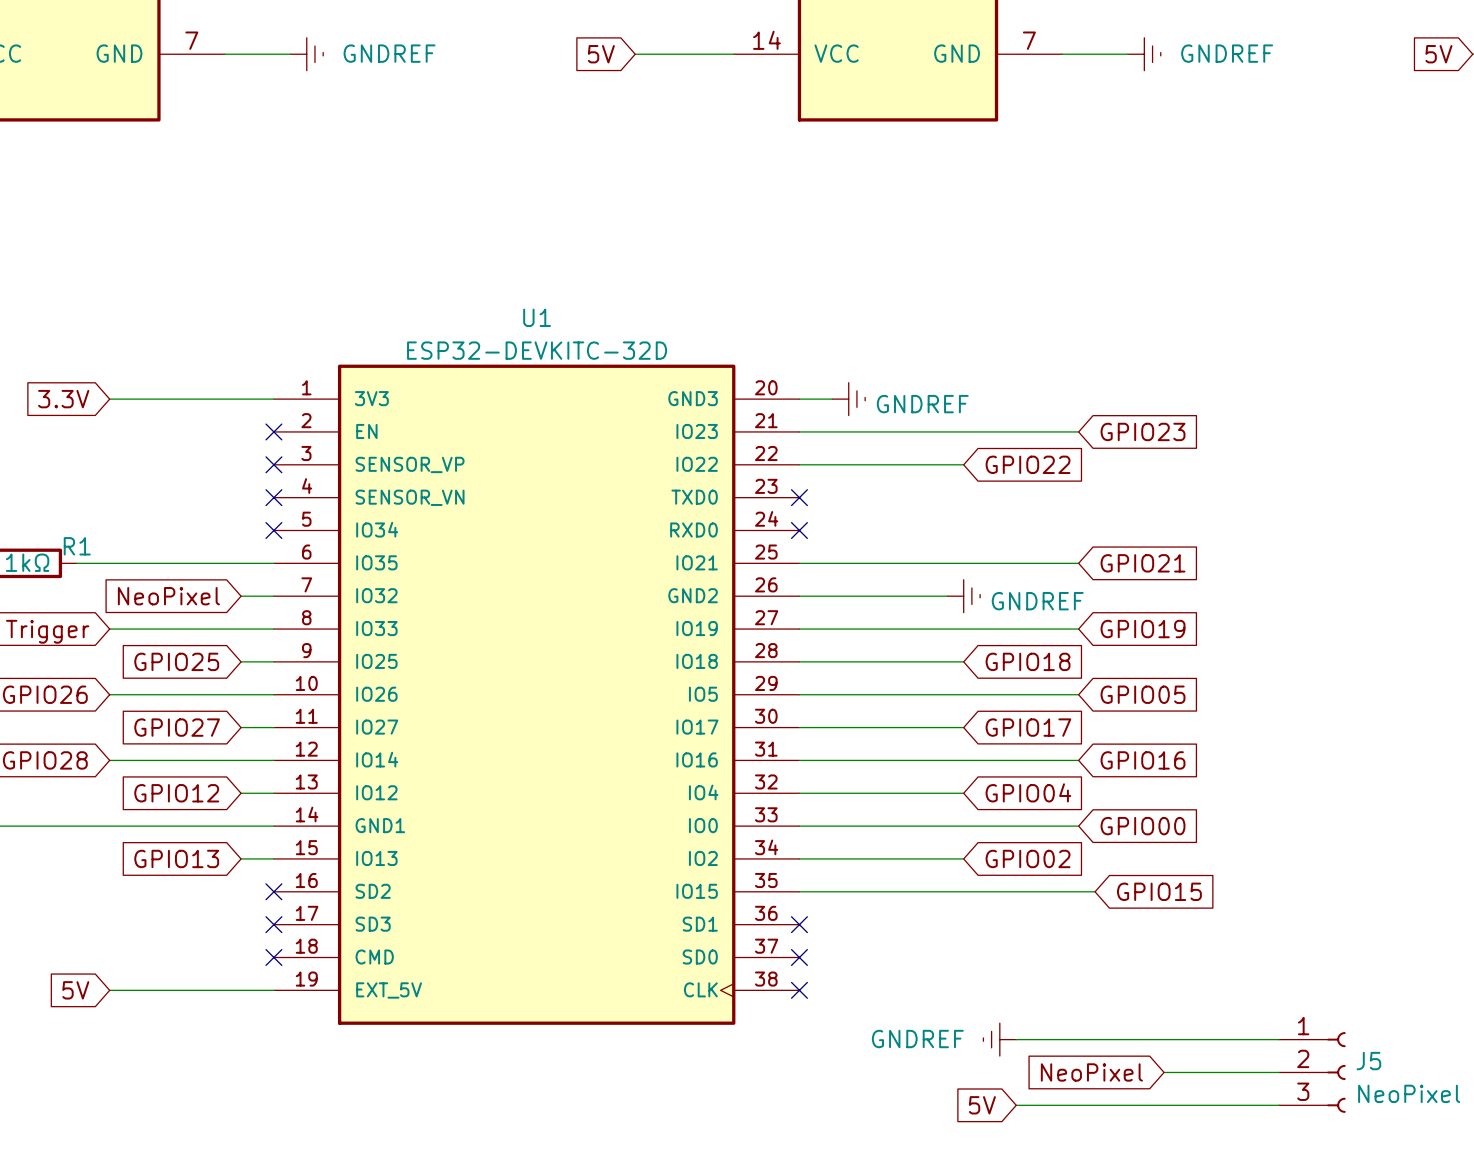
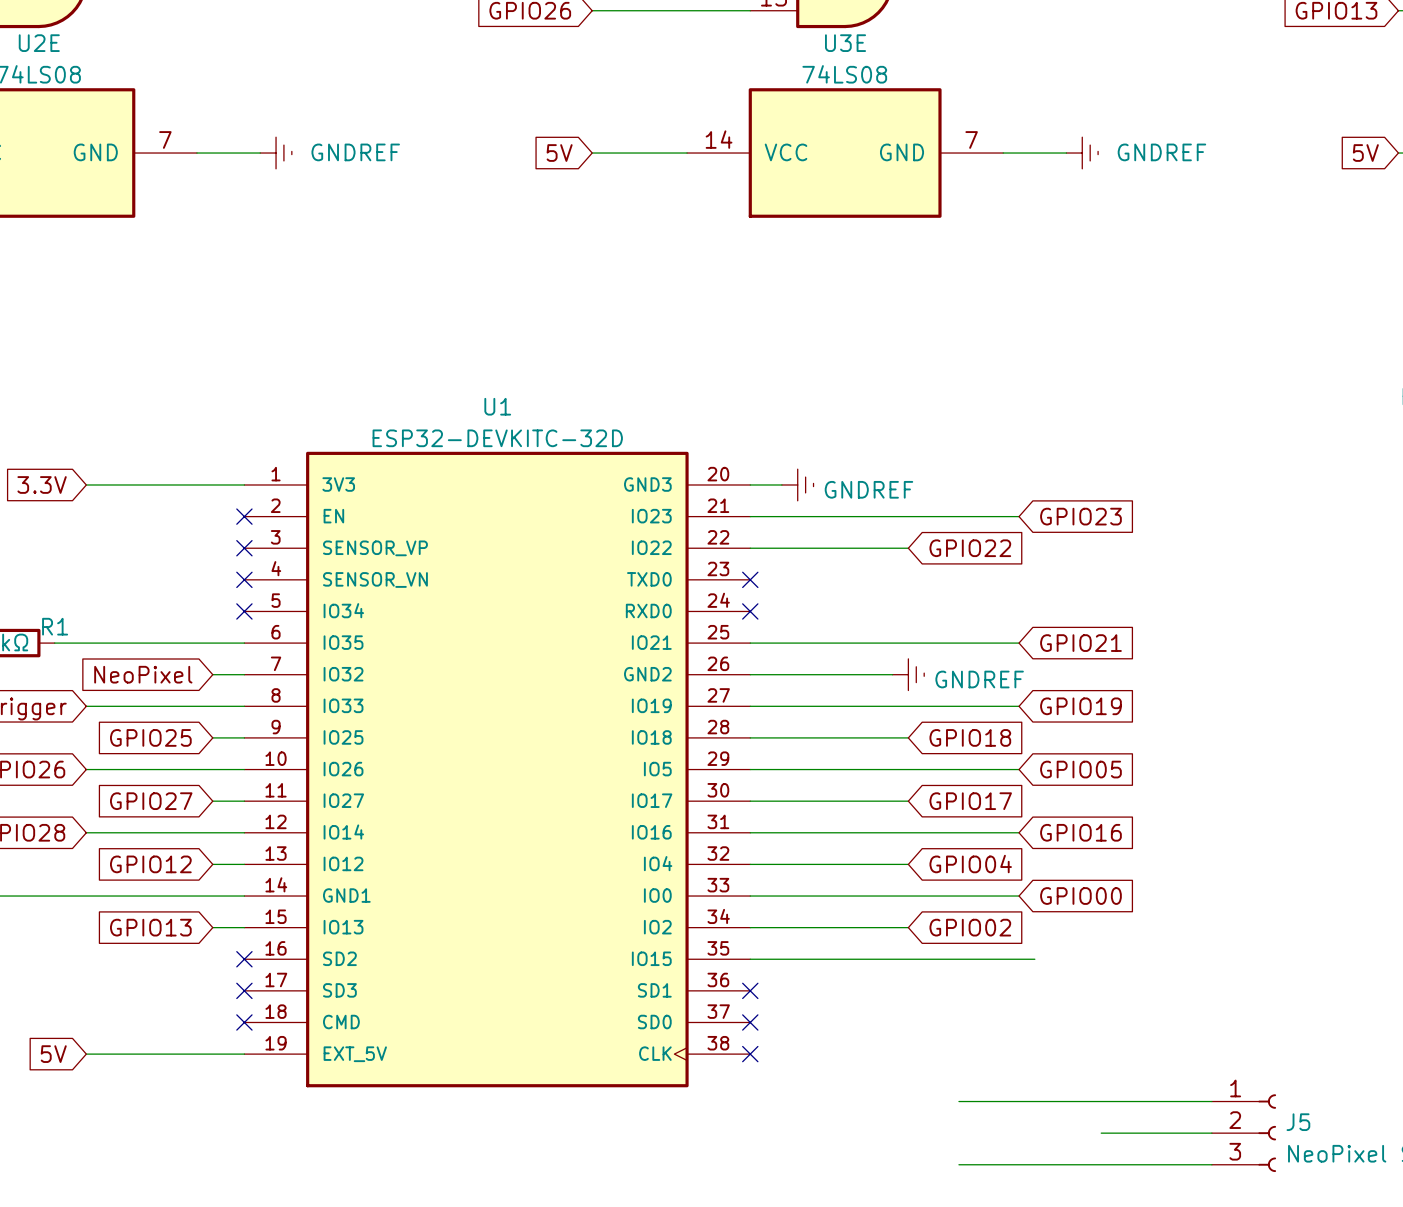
global label: GPIO15 (1159, 891) -> none
power symbol: GNDREF (999, 1039) -> none
global label: NeoPixel (1091, 1072) -> none
global label: 5V (982, 1105) -> none

